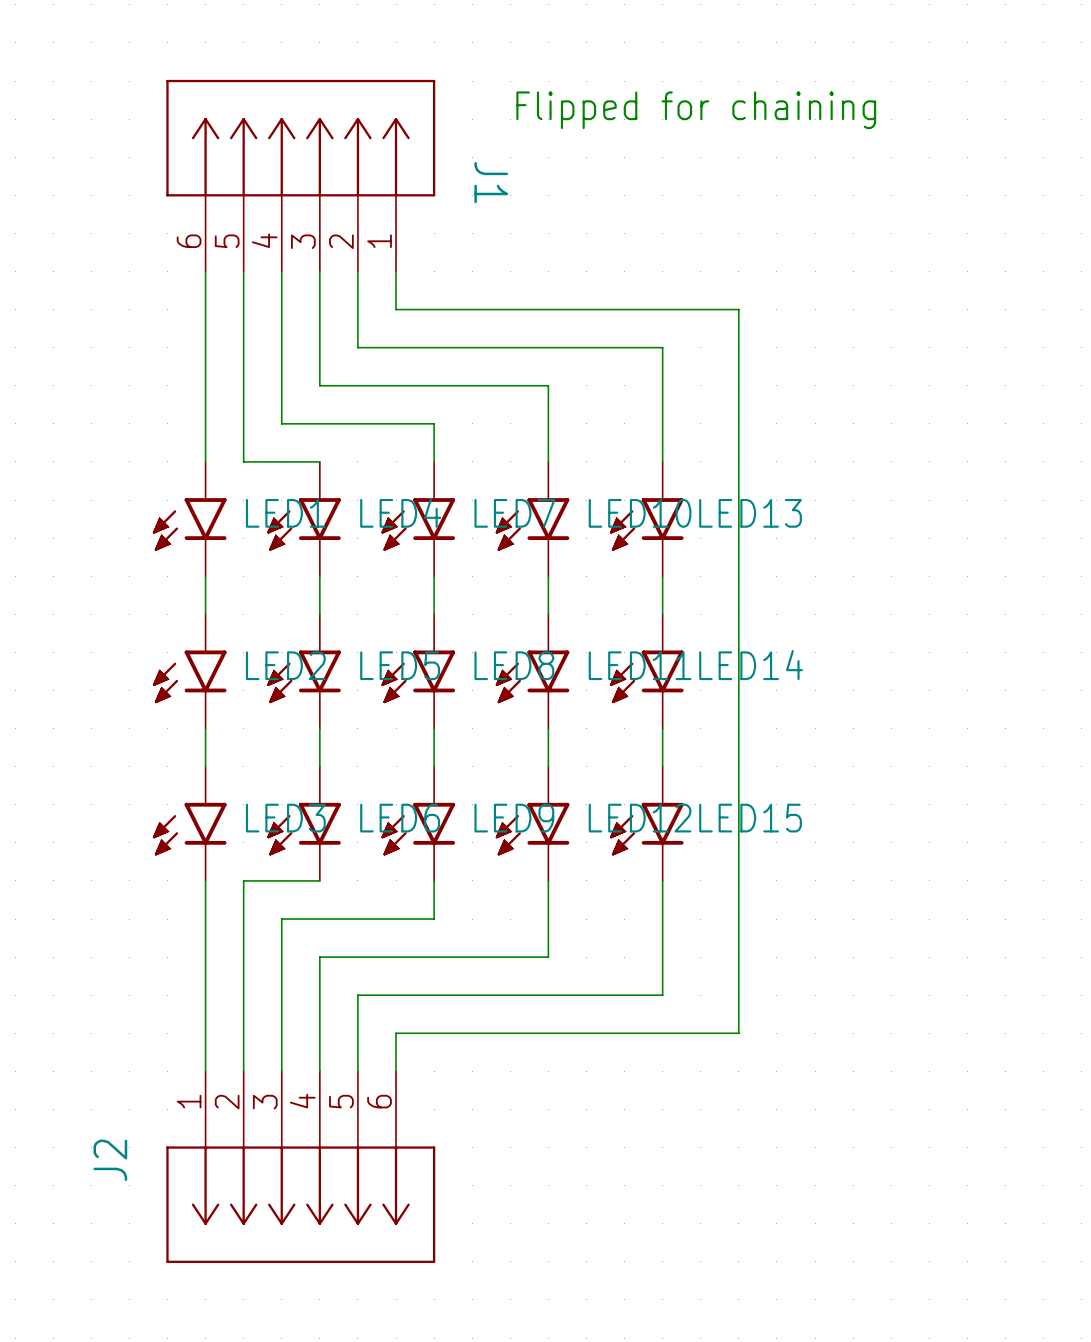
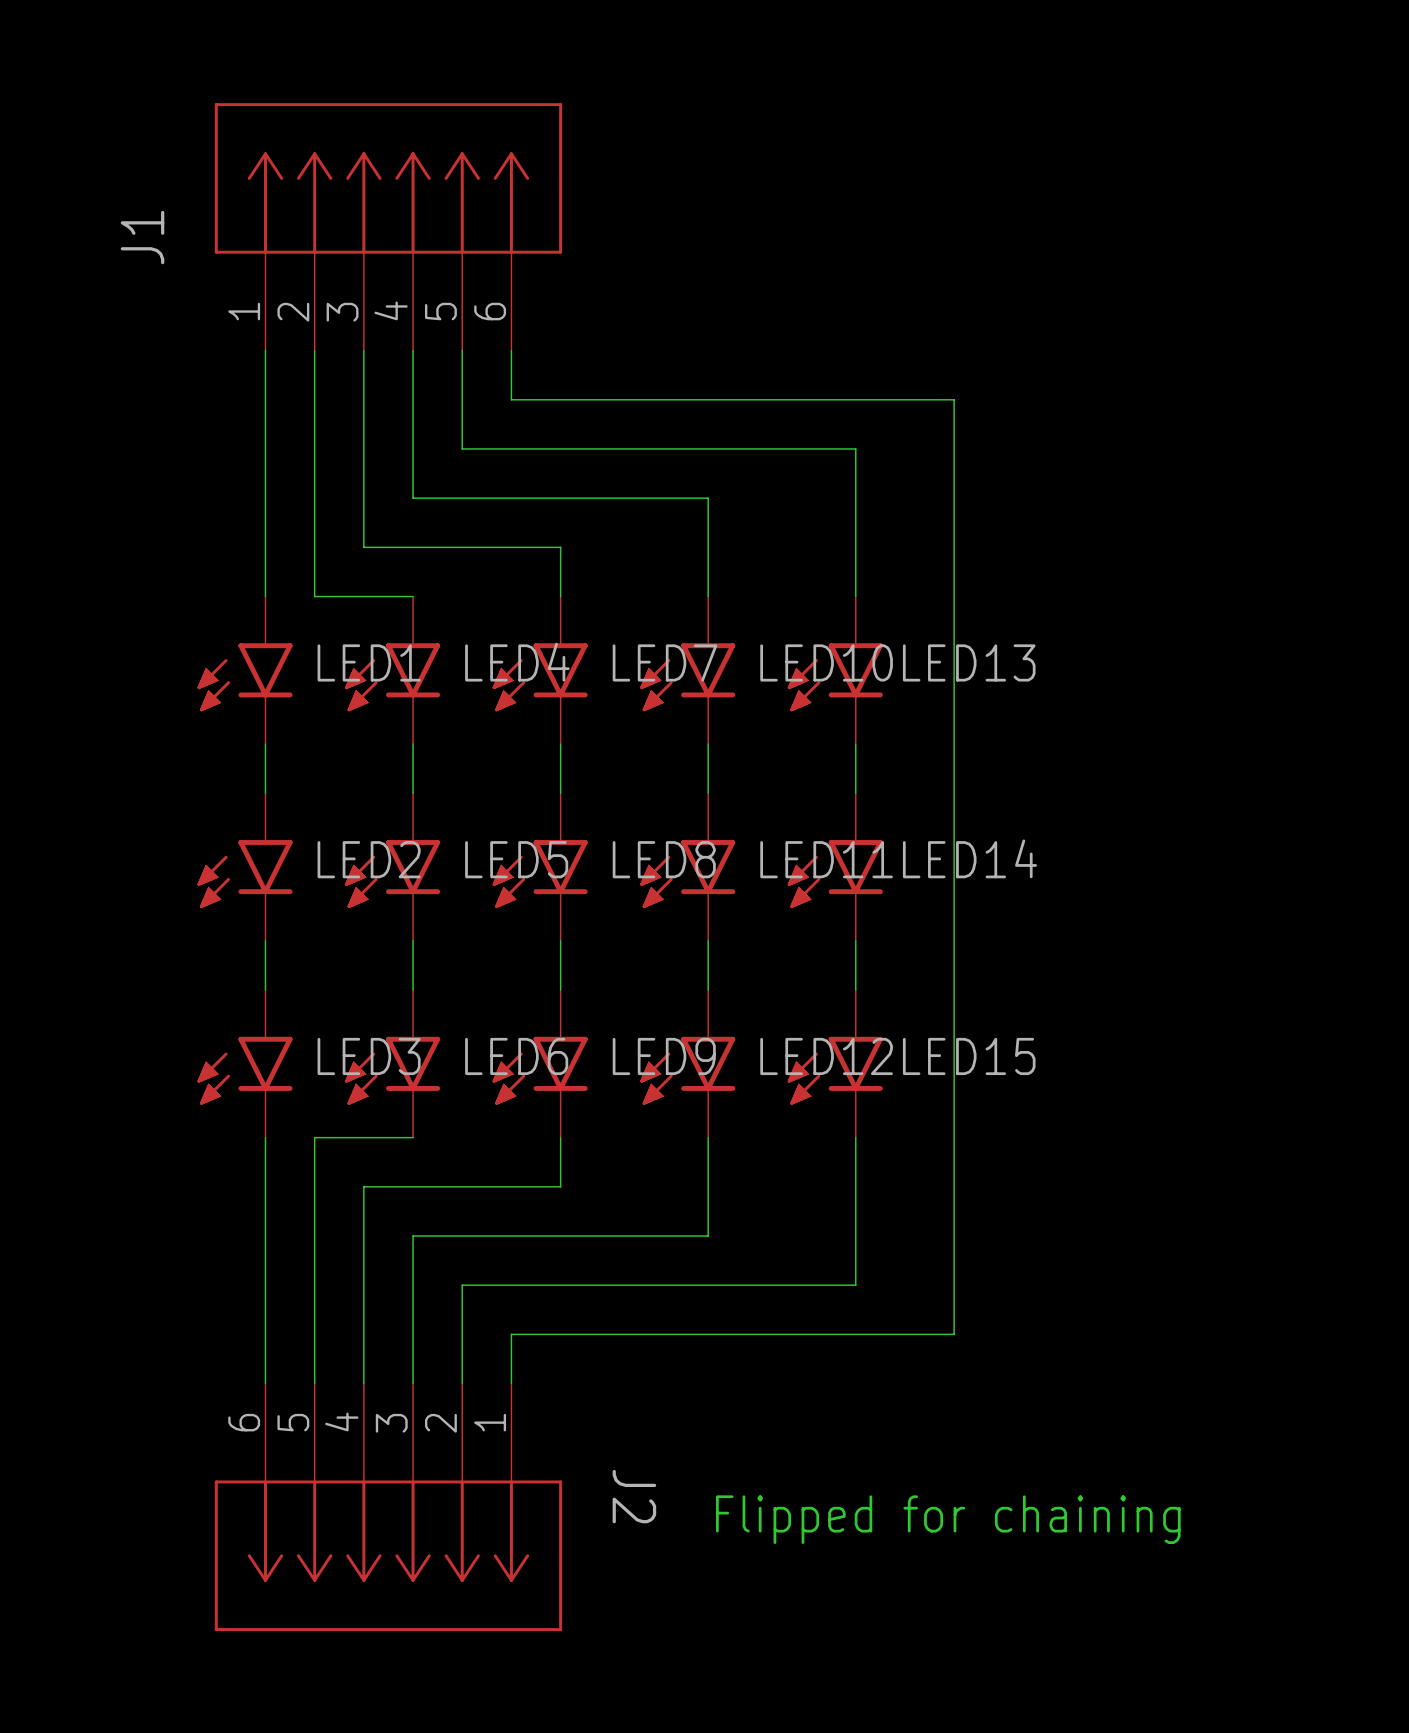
text: Flipped for chaining (696, 110) -> none
J1 flip: as is (300, 138) -> left-right (388, 178)
text: none -> Flipped for chaining (948, 1519)
J2 flip: as is (300, 1204) -> left-right (388, 1555)

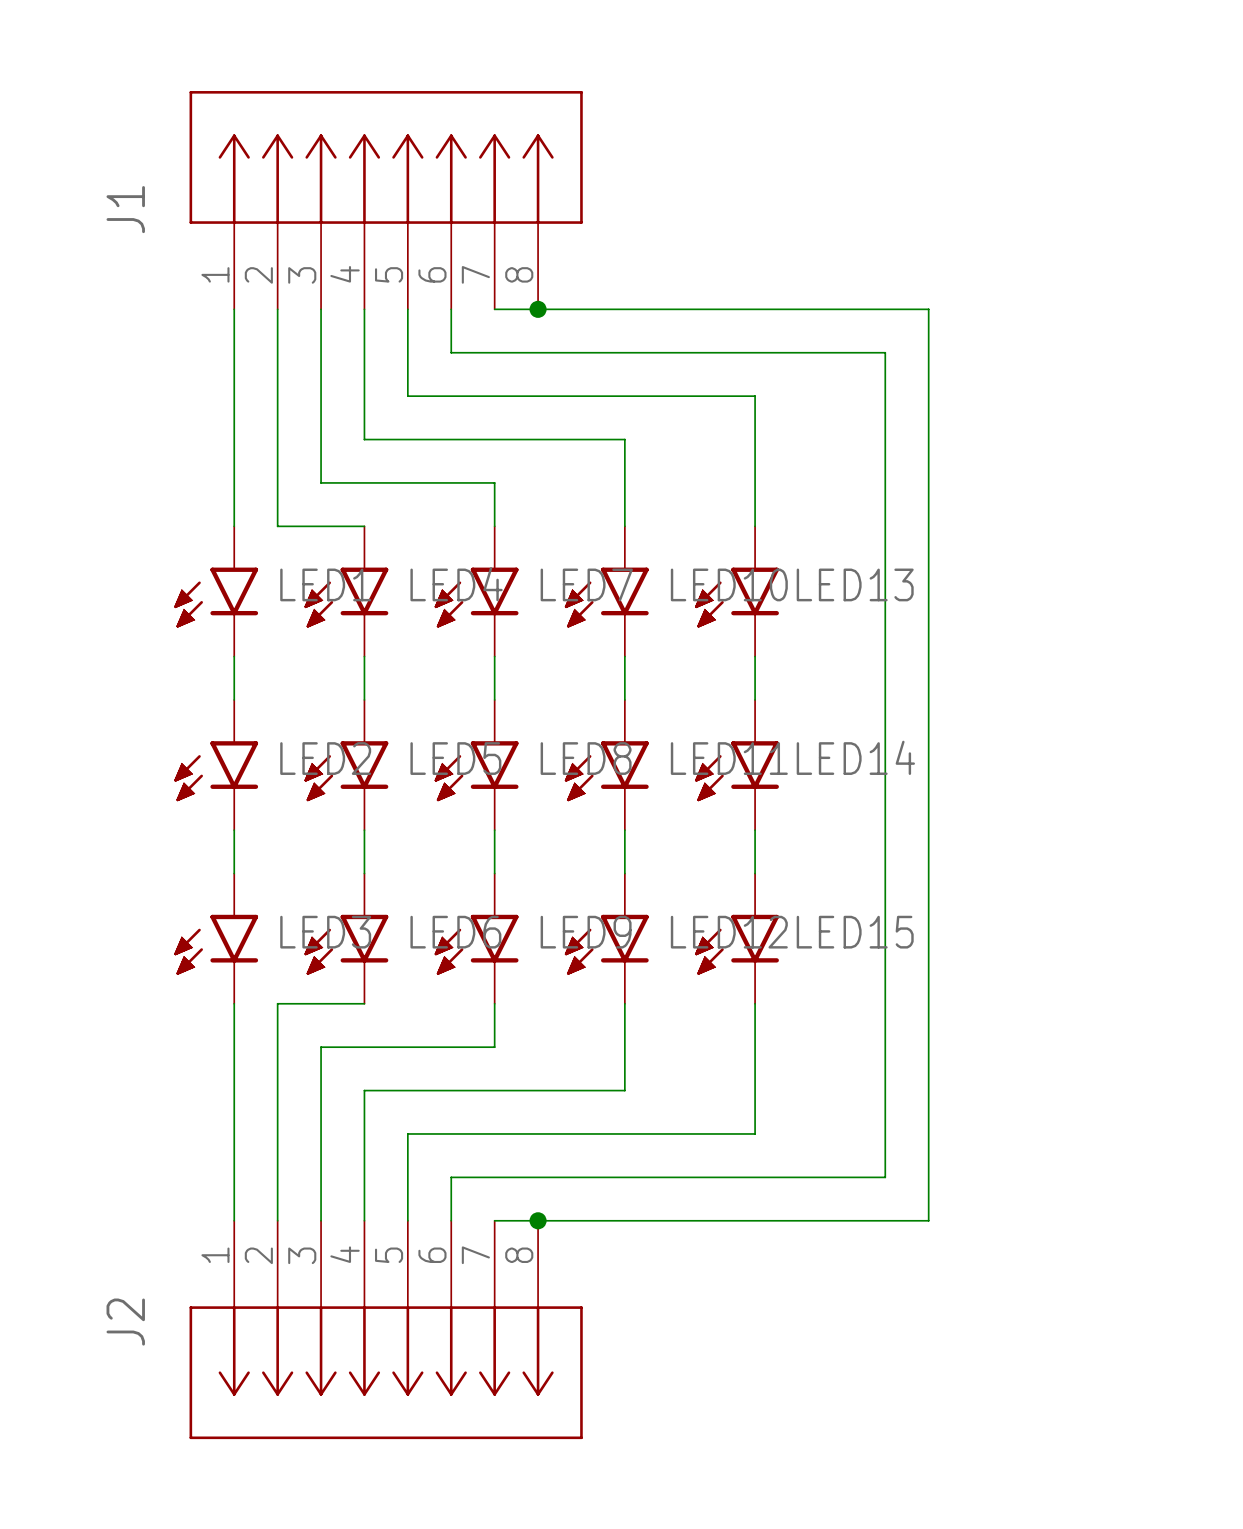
J1 symbol: [214, 103, 563, 351] -> [189, 91, 583, 310]
wire: none -> (494, 309) (928, 309) (928, 1220) (494, 1220)
junction: none -> (538, 309)
wire: (954, 399) (954, 1334) -> (841, 352) (885, 352) (885, 1177) (841, 1177)
J2 symbol: [214, 1383, 563, 1632] -> [189, 1220, 583, 1440]
junction: none -> (538, 1220)
J2 name position: J2 (634, 1496) -> J2 (125, 1322)
text: Flipped for chaining (948, 1519) -> none

